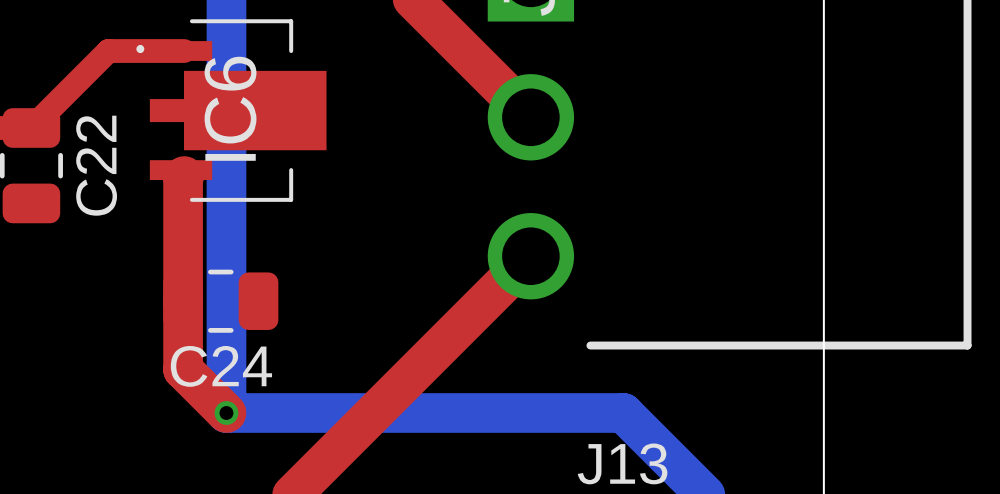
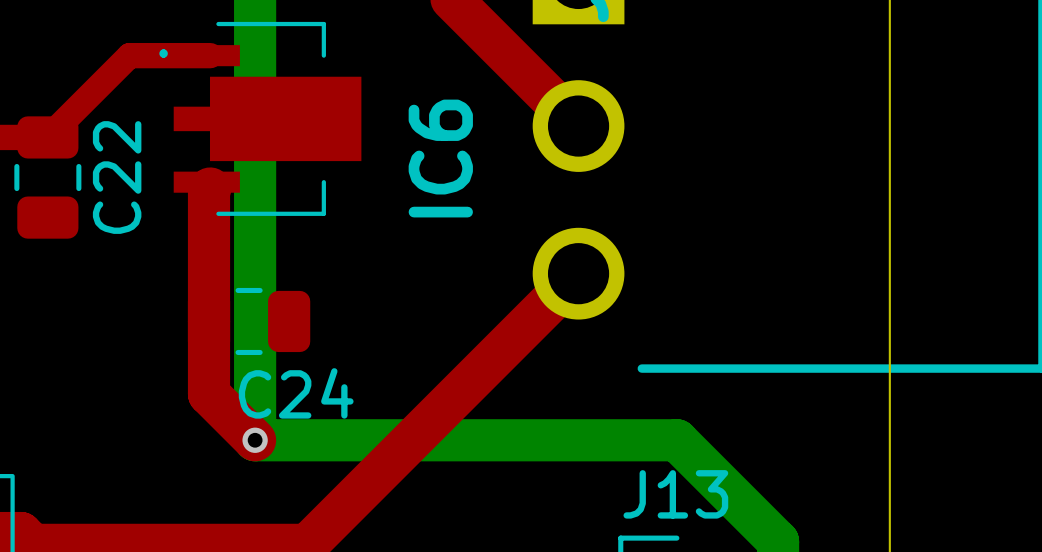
IC6 name position: IC6 (230, 108) -> IC6 (440, 158)
C24 name position: C24 (221, 366) -> C24 (296, 393)

